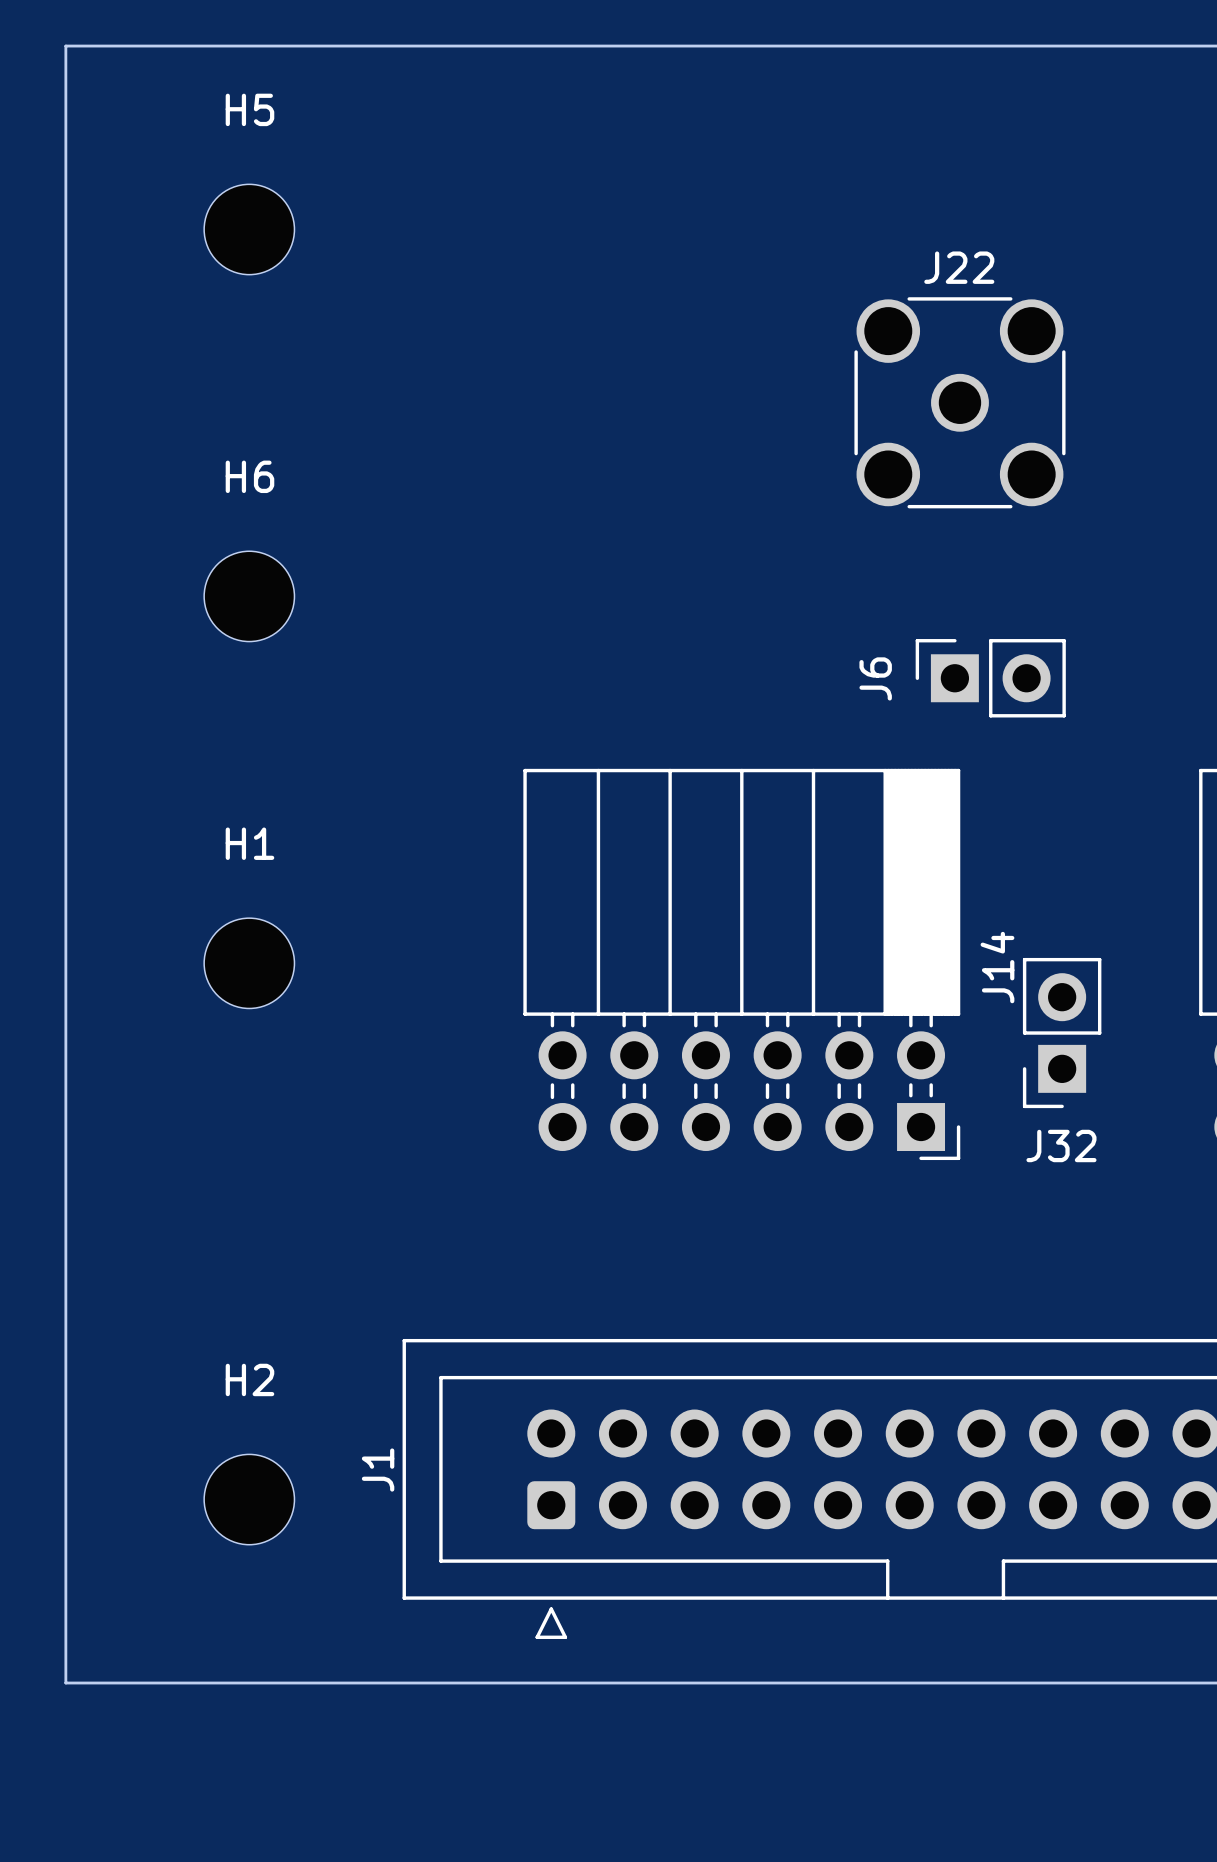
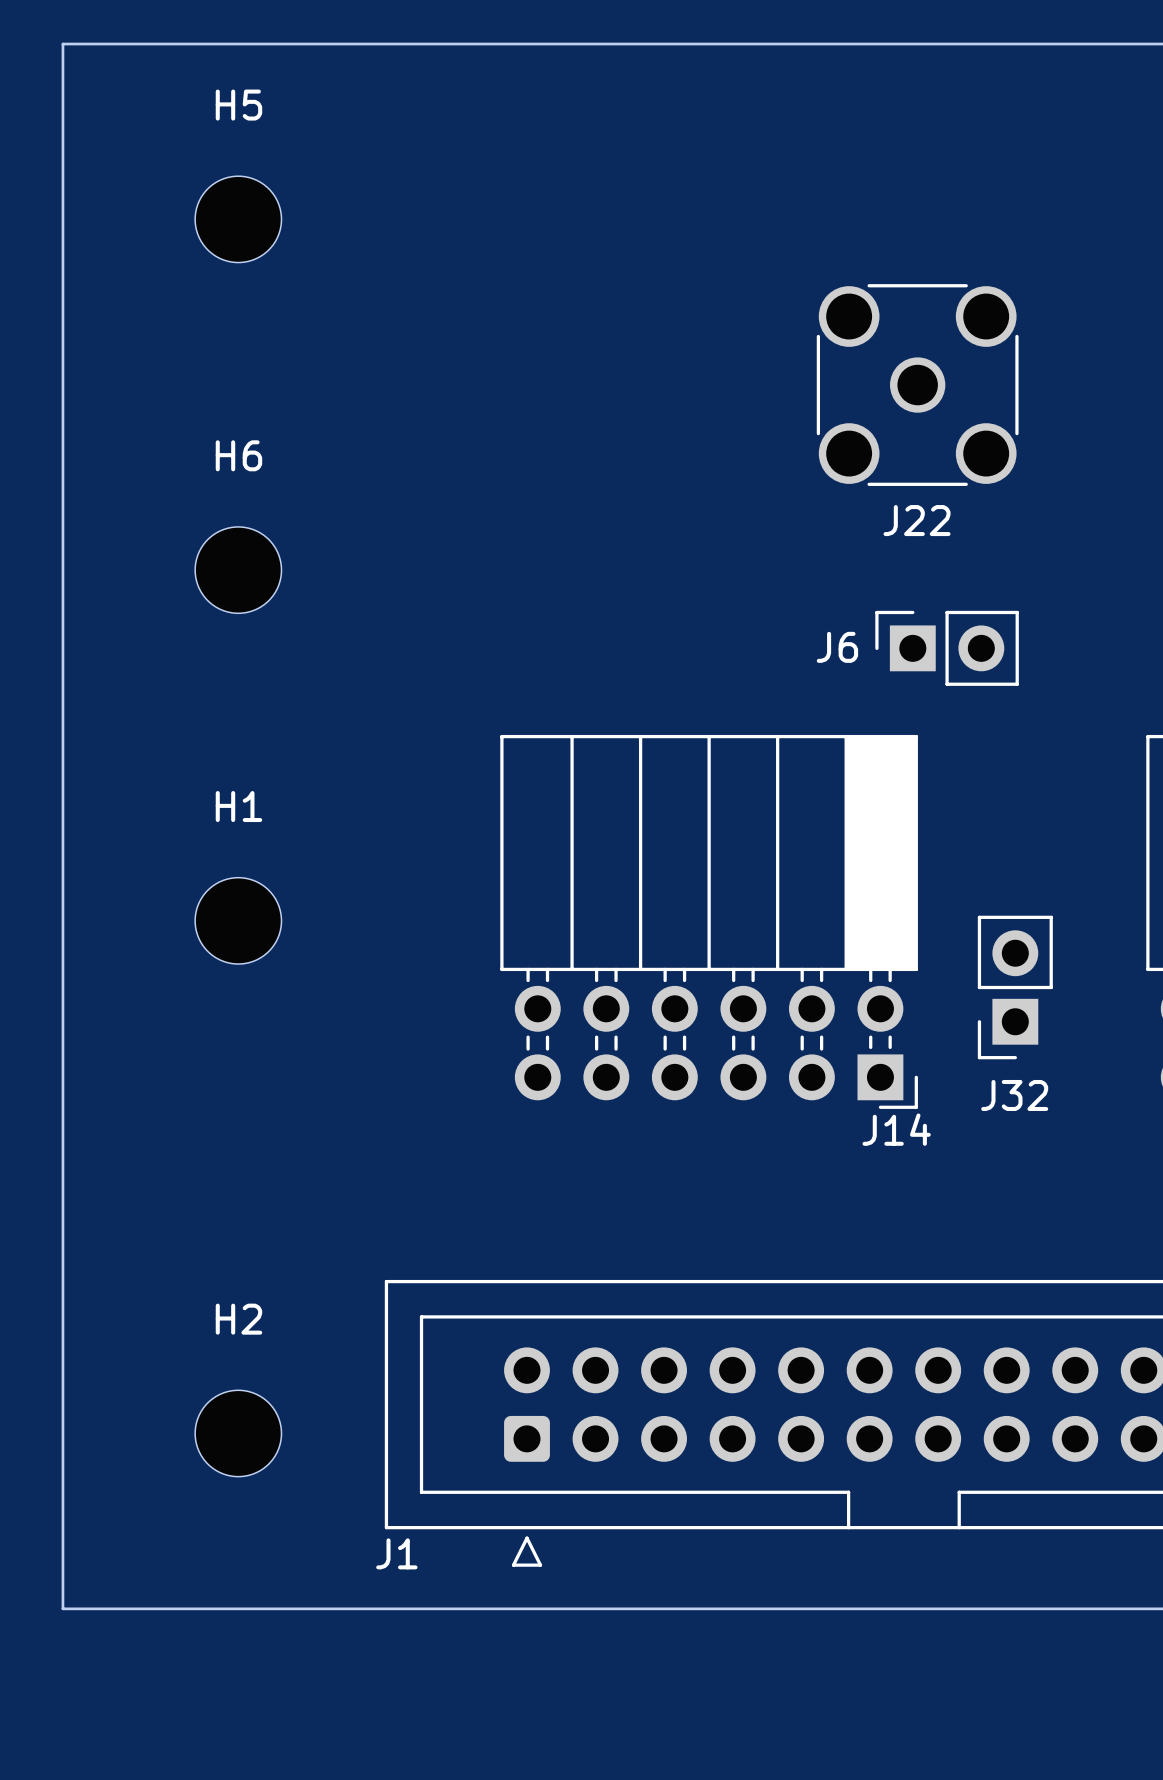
J22 name position: J22 (959, 267) -> J22 (917, 520)
J6 name rotation: 0° (875, 678) -> 90° clockwise (837, 647)
J14 name rotation: 0° (997, 967) -> 90° clockwise (896, 1129)
J14 name position: J14 (997, 967) -> J14 (896, 1129)
J1 name rotation: 0° (378, 1470) -> 90° clockwise (396, 1553)
J1 name position: J1 (378, 1470) -> J1 (396, 1553)

